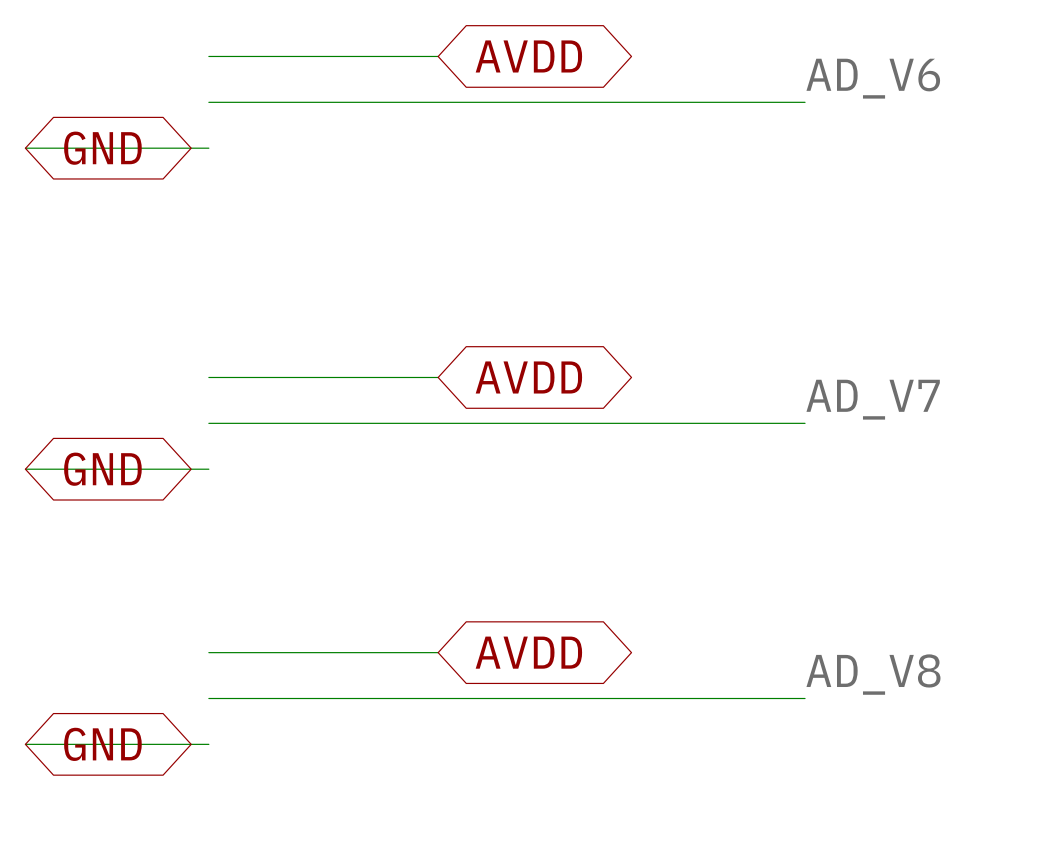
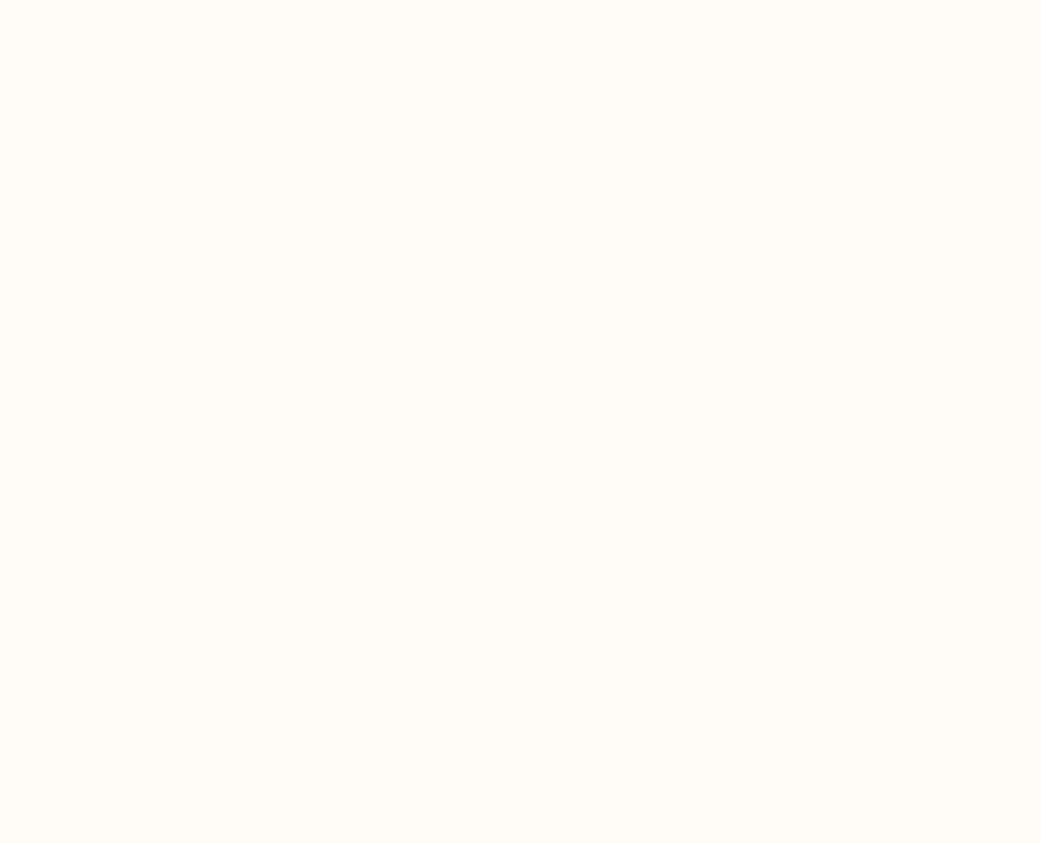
wire: (208, 56) (438, 56) -> none
global label: AVDD (528, 56) -> none
label: AD_V6 (873, 78) -> none
wire: (208, 102) (805, 102) -> none
wire: (25, 148) (208, 148) -> none
global label: GND (102, 148) -> none
wire: (208, 377) (438, 377) -> none
global label: AVDD (528, 377) -> none
label: AD_V7 (873, 399) -> none
wire: (208, 423) (805, 423) -> none
wire: (25, 469) (208, 469) -> none
global label: GND (102, 469) -> none
wire: (208, 652) (438, 652) -> none
global label: AVDD (528, 652) -> none
label: AD_V8 (873, 674) -> none
wire: (208, 698) (805, 698) -> none
wire: (25, 744) (208, 744) -> none
global label: GND (102, 744) -> none

